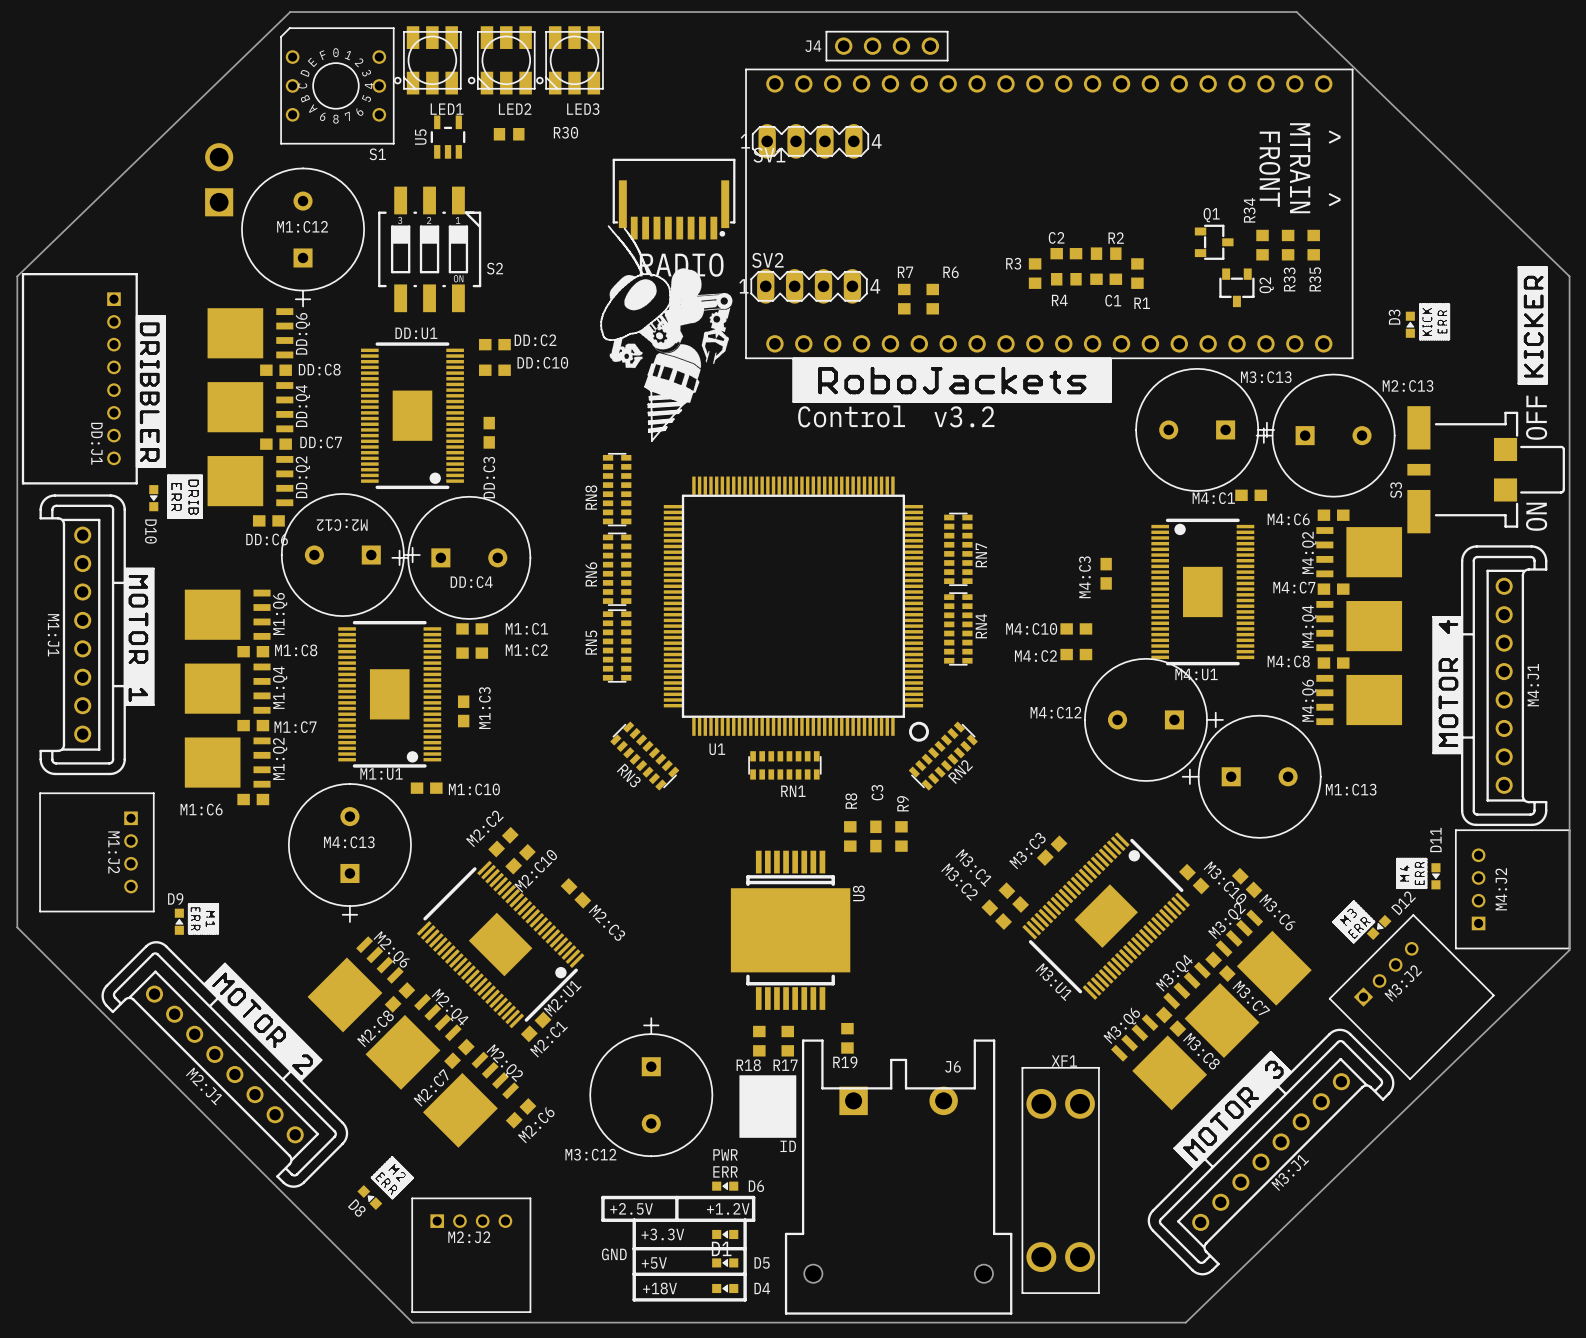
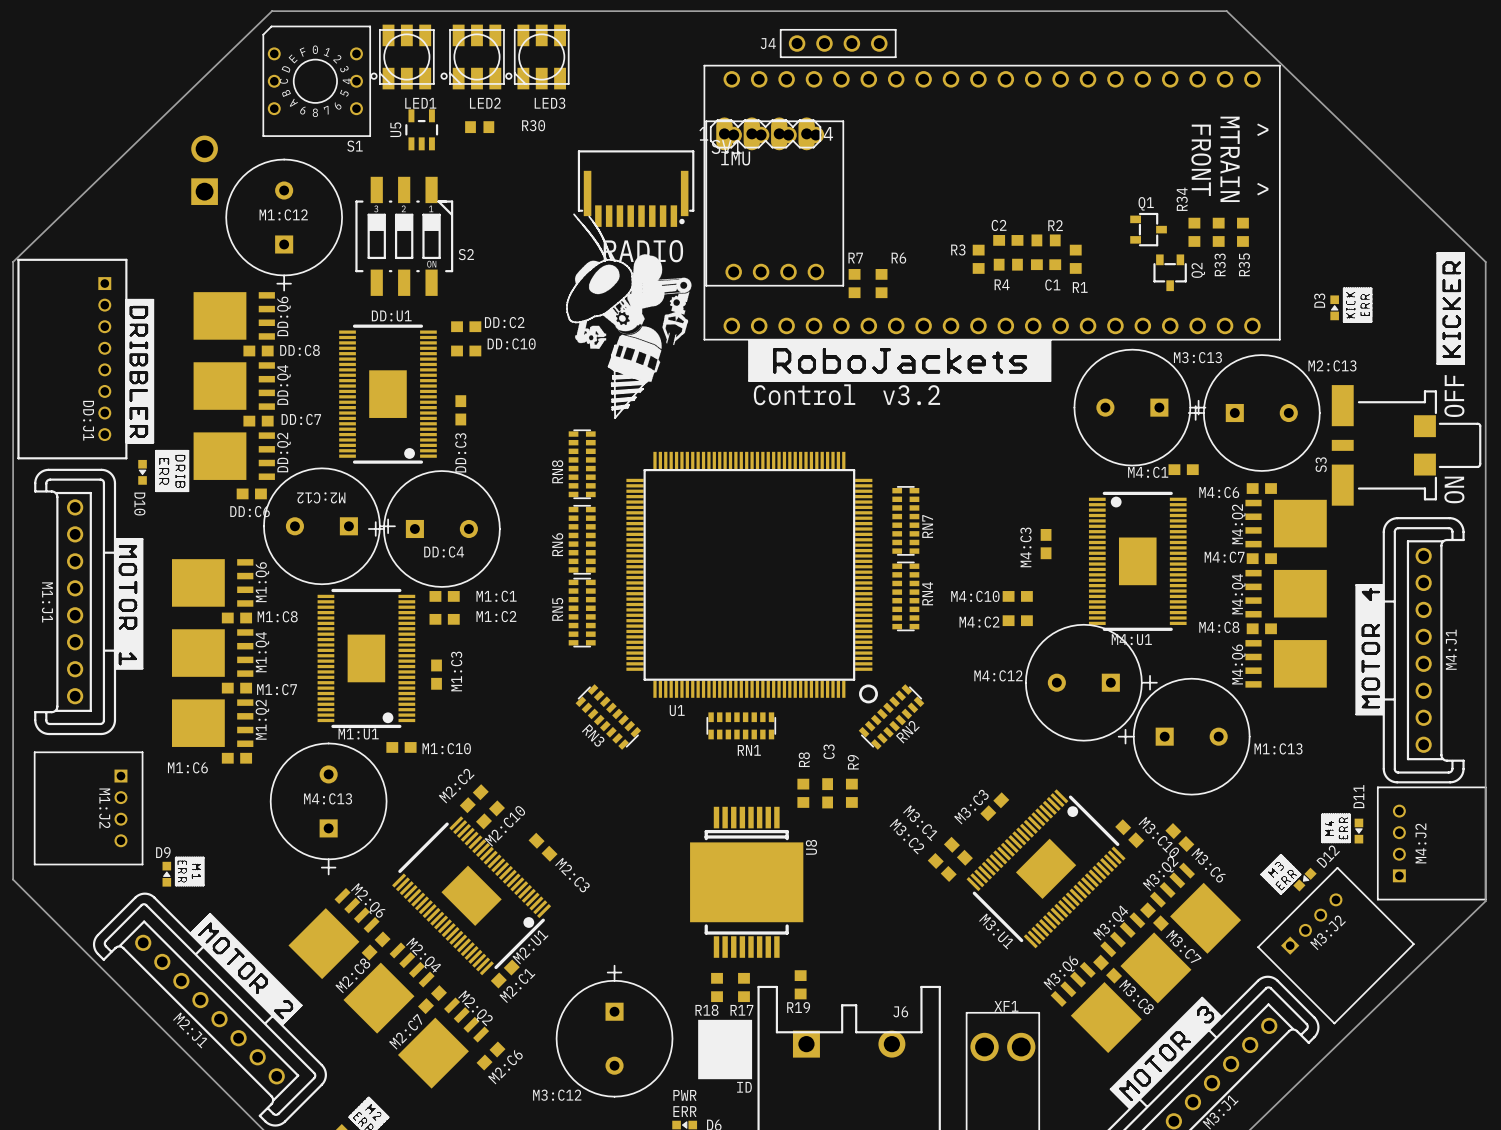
IMU: none -> (774, 203)
SV2: (809, 286) -> none

